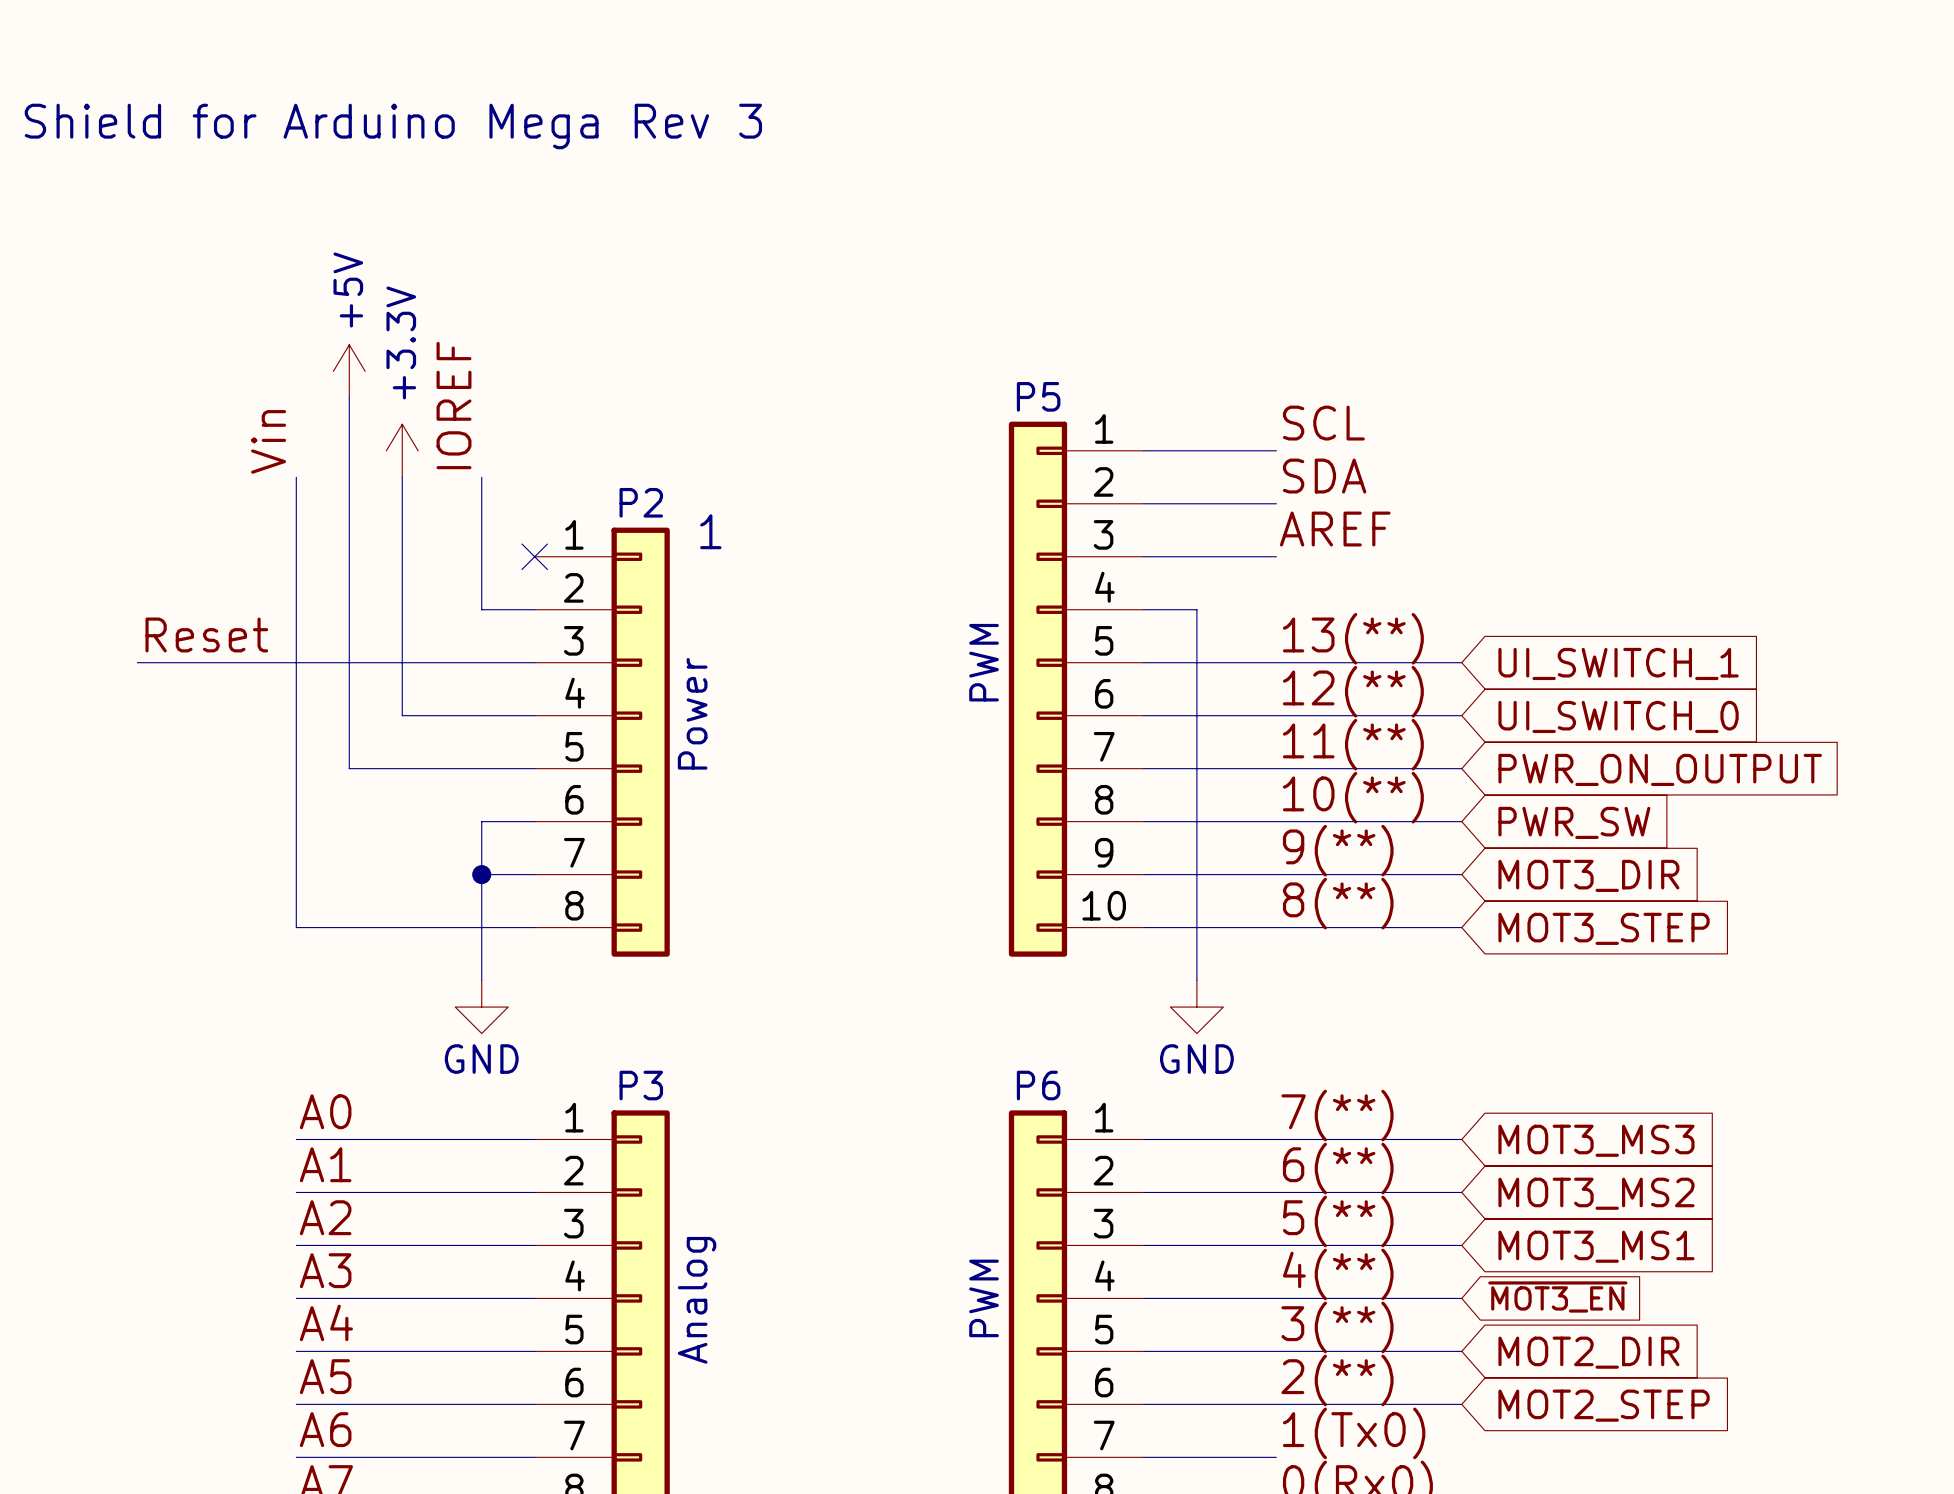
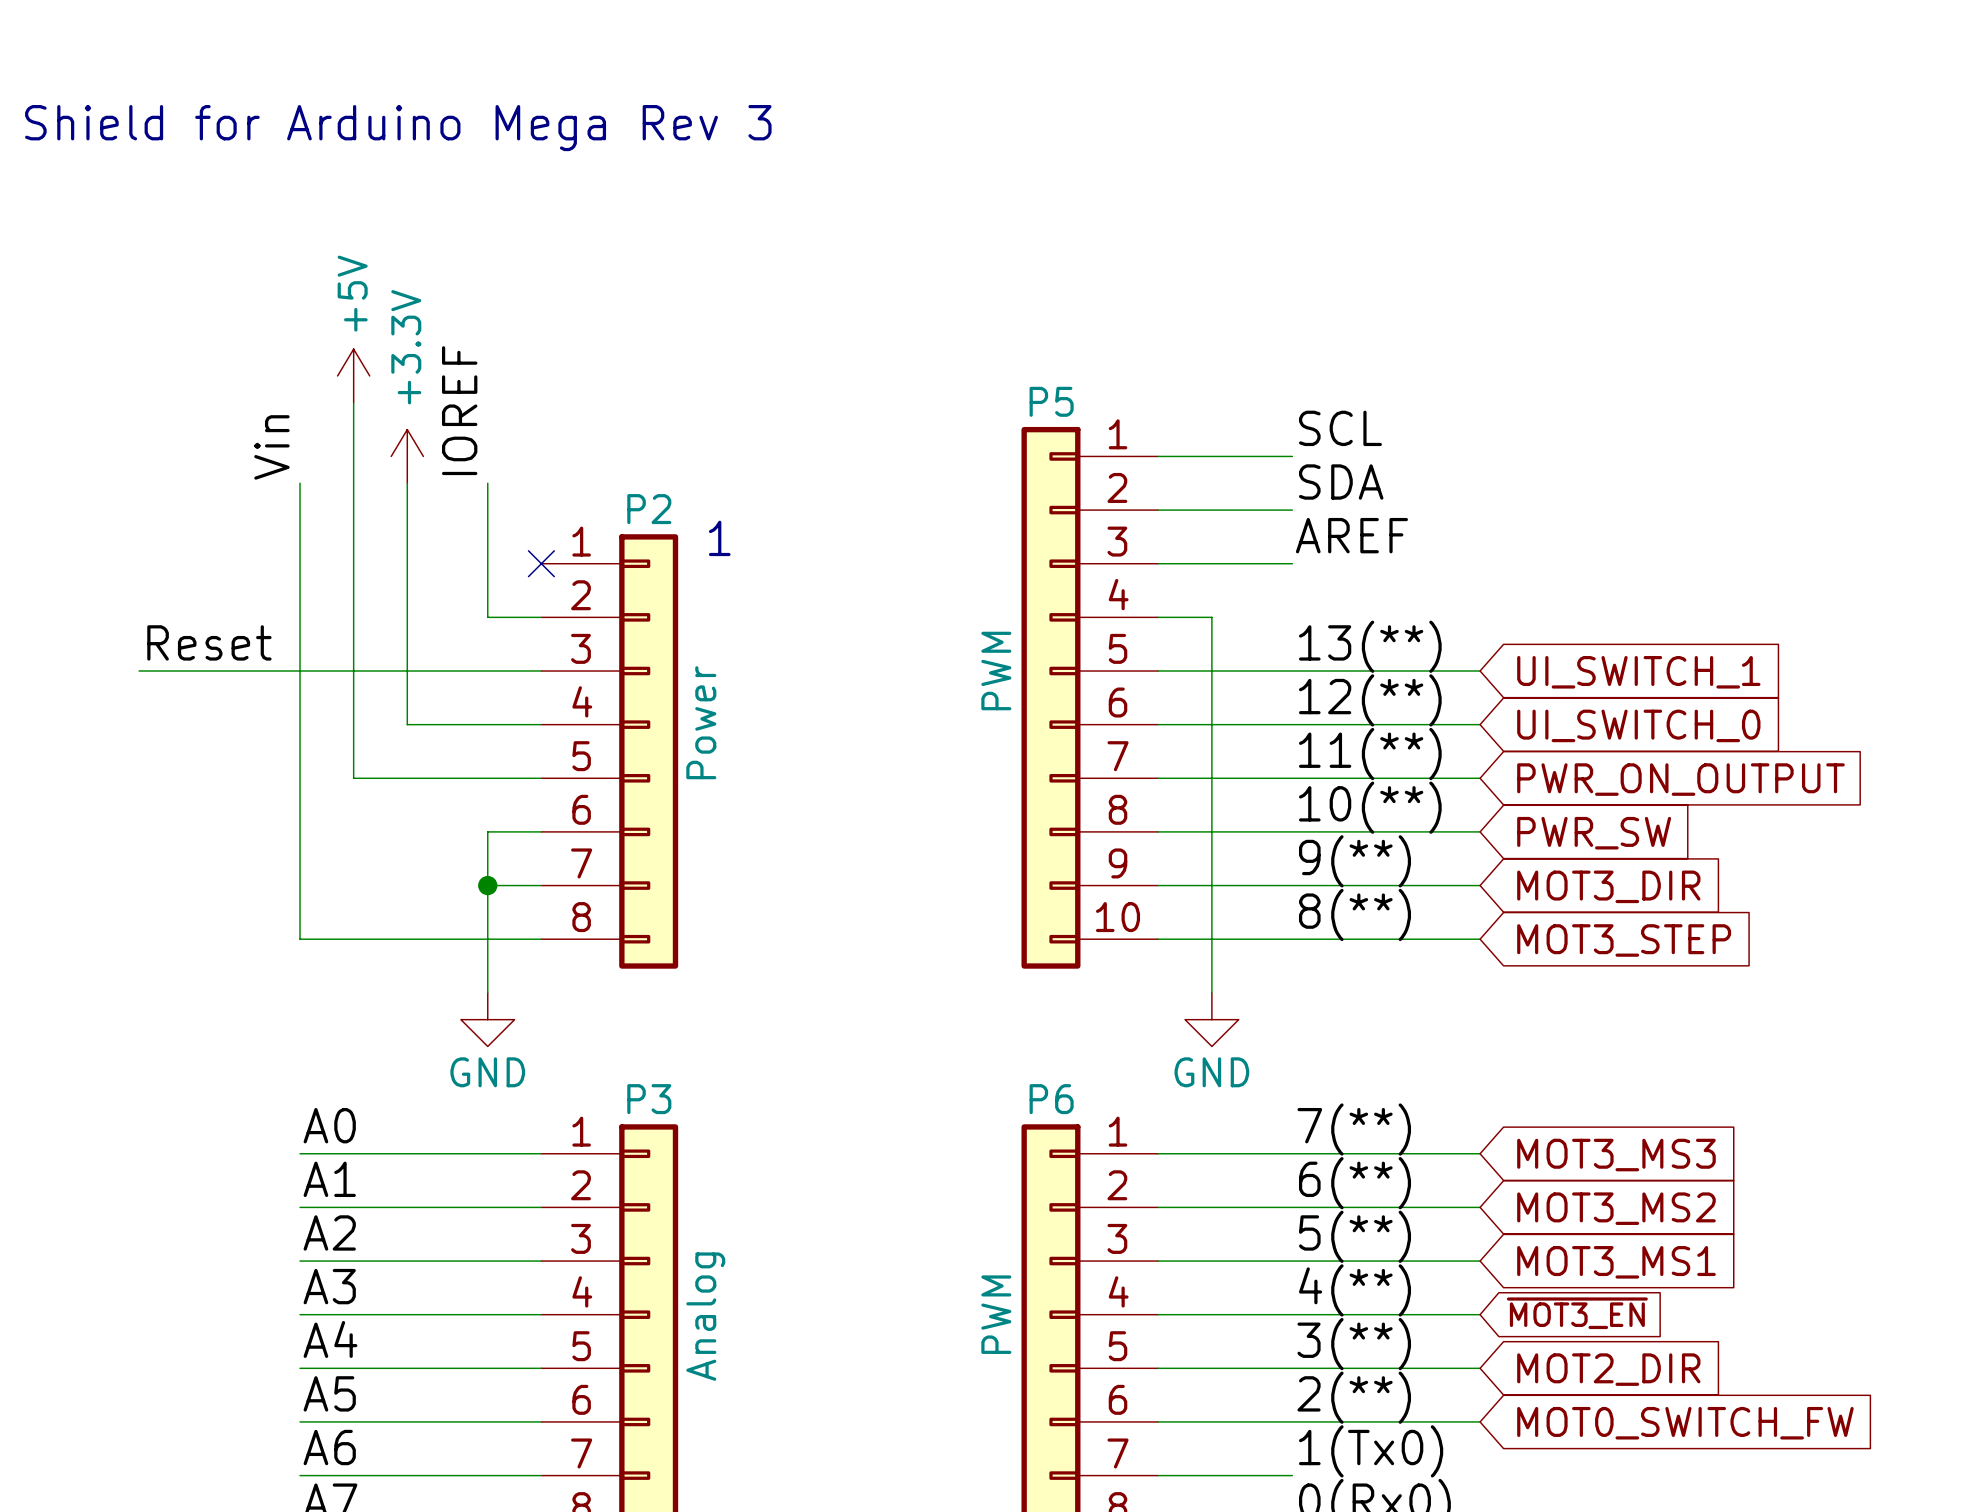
global label: MOT2_STEP (1604, 1405) -> MOT0_SWITCH_FW (1685, 1423)

